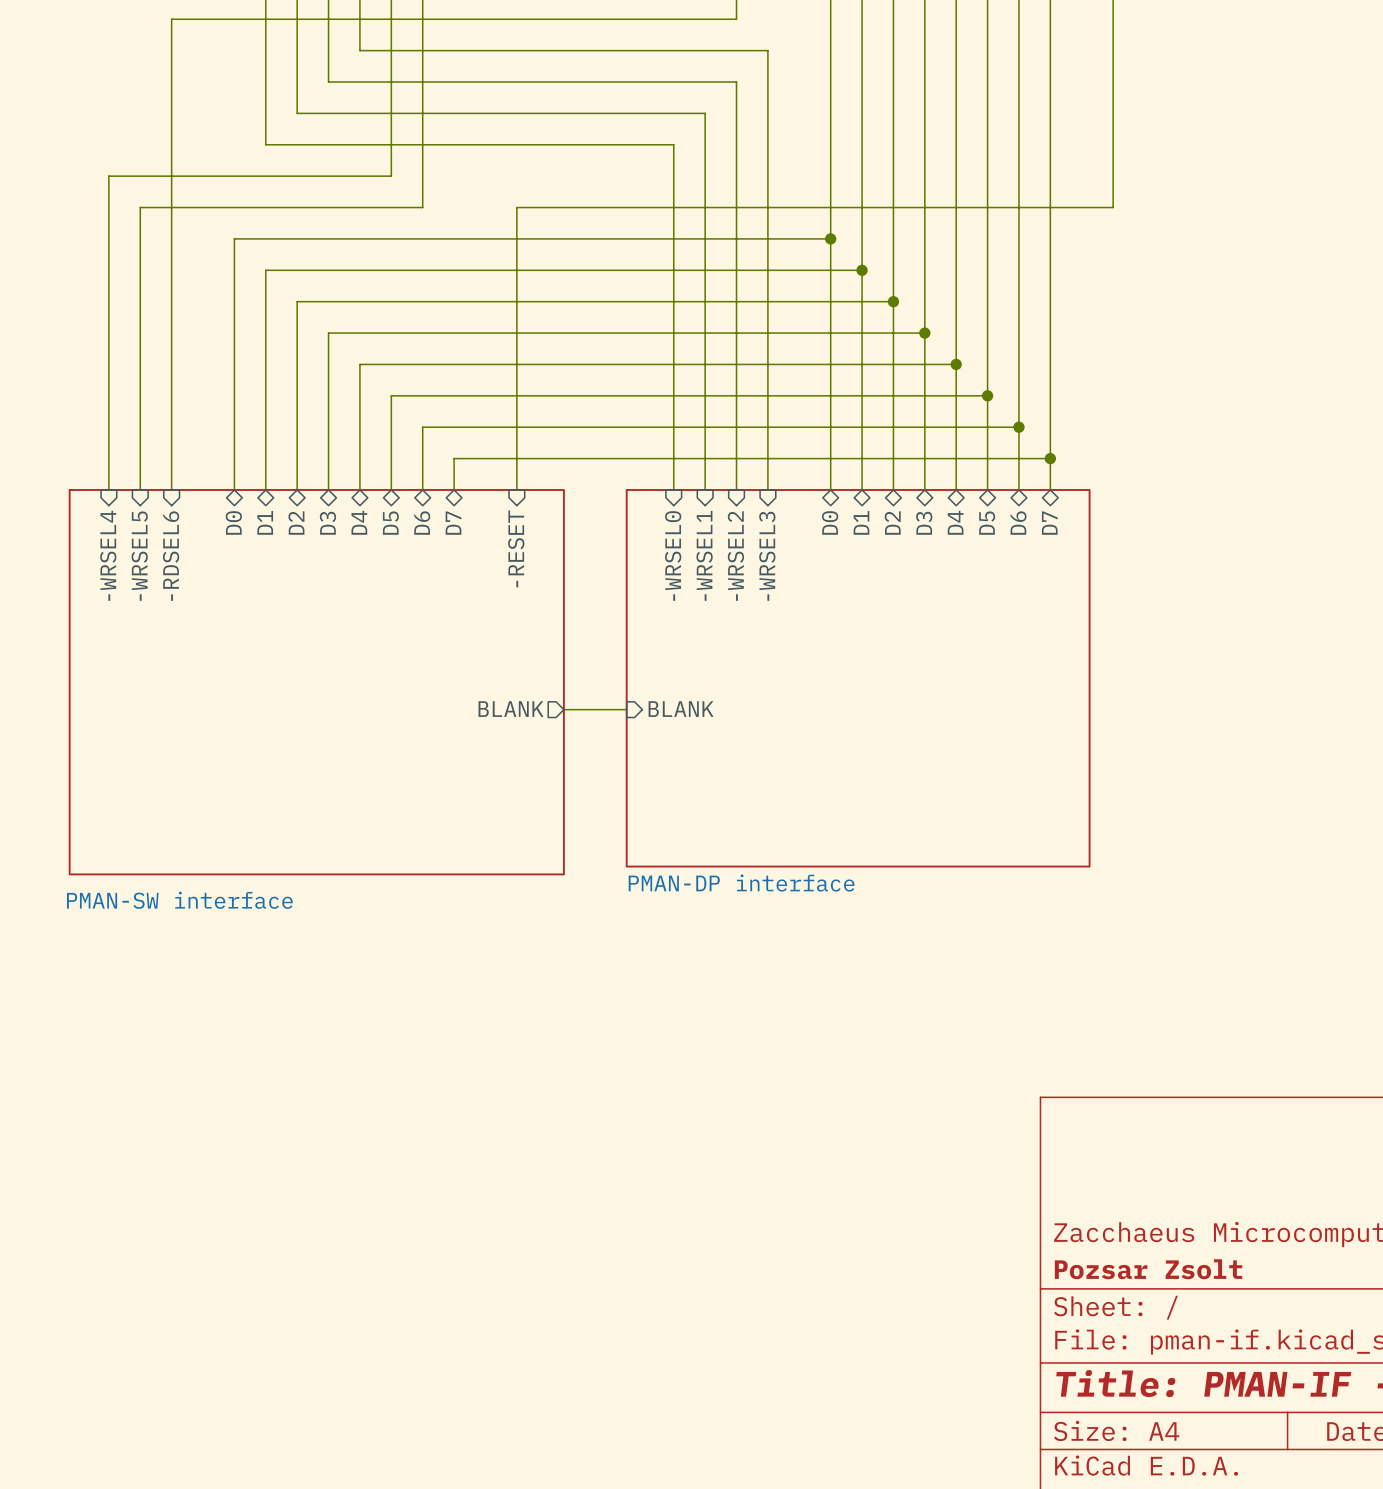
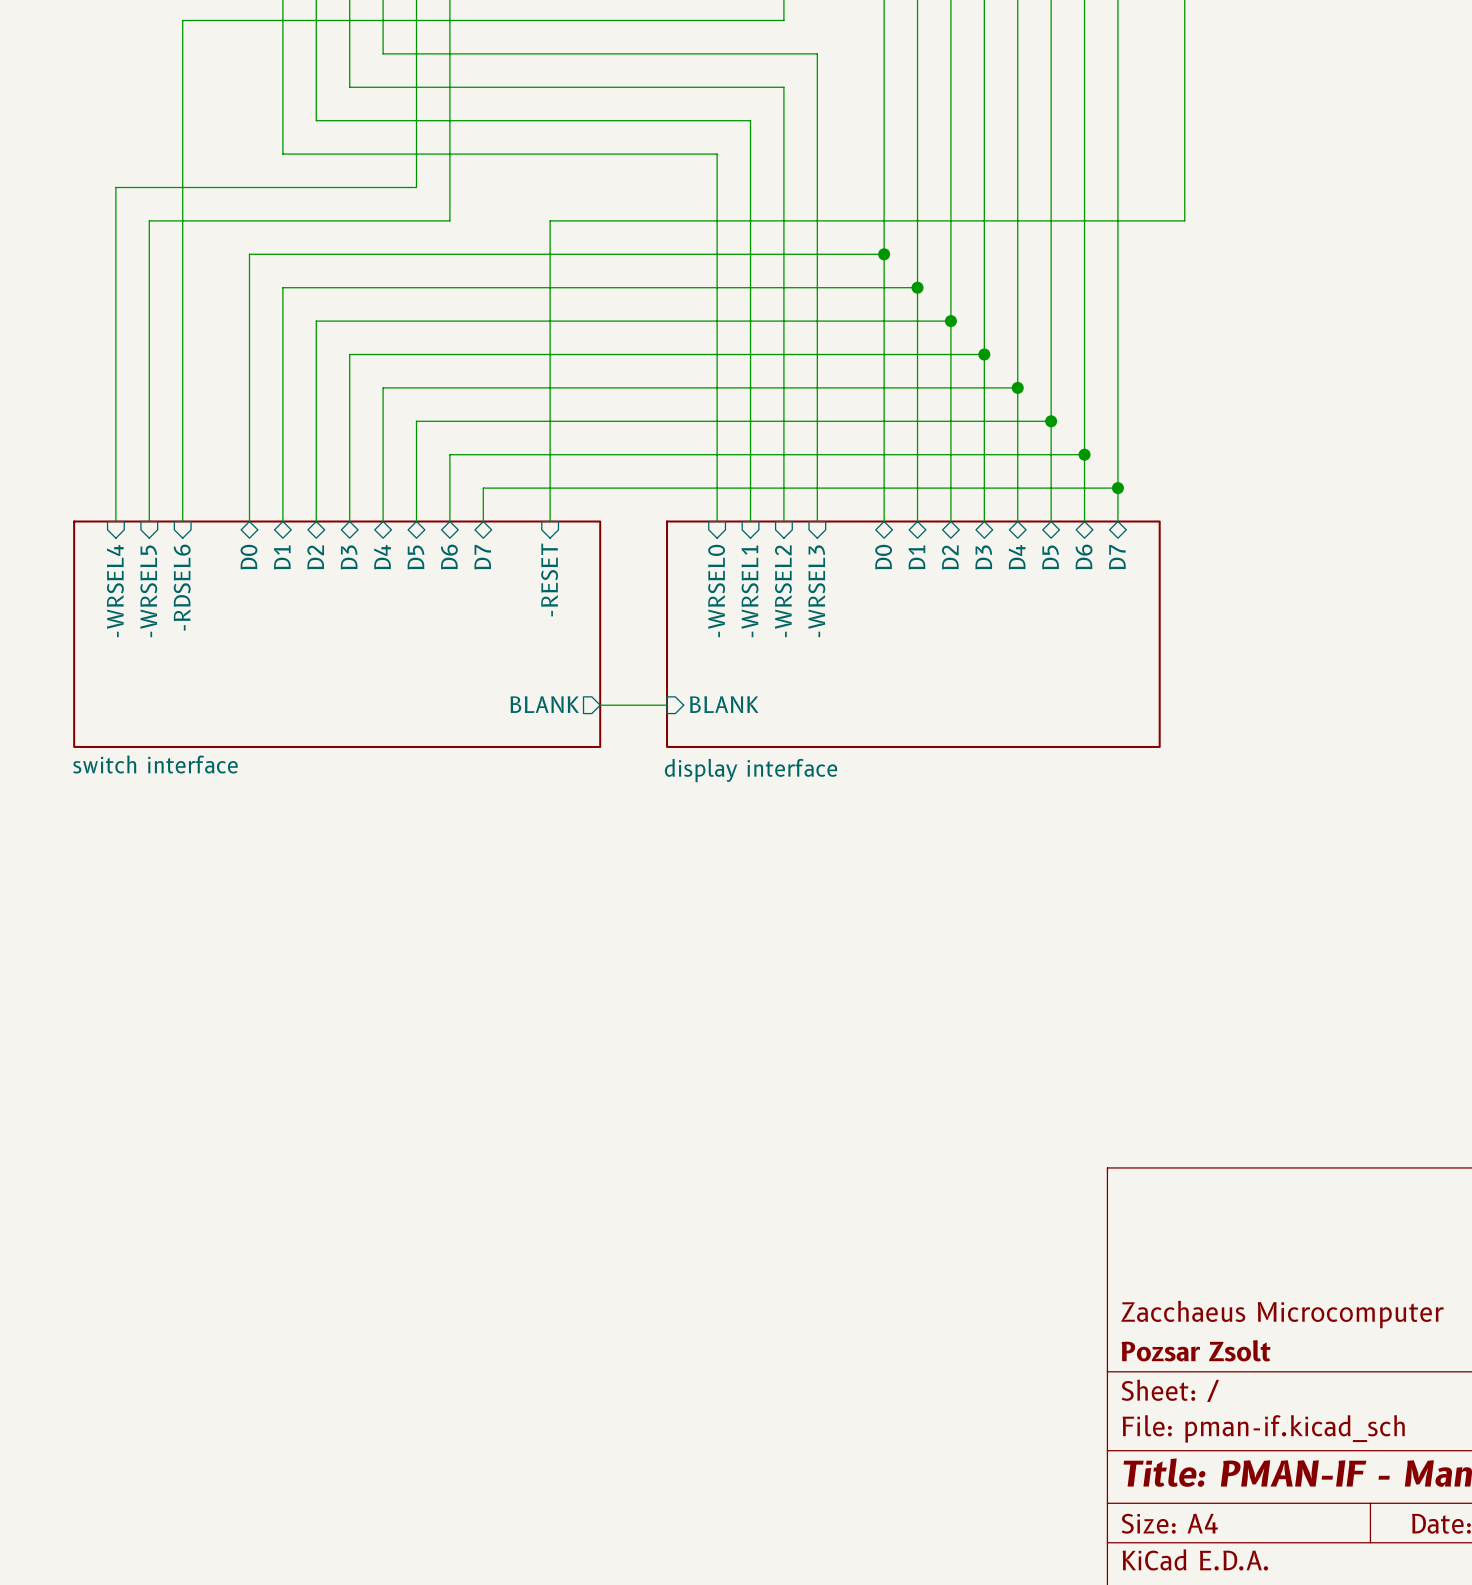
sheet switch interface: none -> (337, 634)
sheet display interface: none -> (913, 634)
sheet PMAN-DP interface: (858, 678) -> none
sheet PMAN-SW interface: (316, 682) -> none
sheet pin position: BLANK (511, 709) -> BLANK (544, 704)
wire: (563, 709) (626, 709) -> (600, 705) (667, 705)
sheet pin position: BLANK (681, 709) -> BLANK (724, 704)

